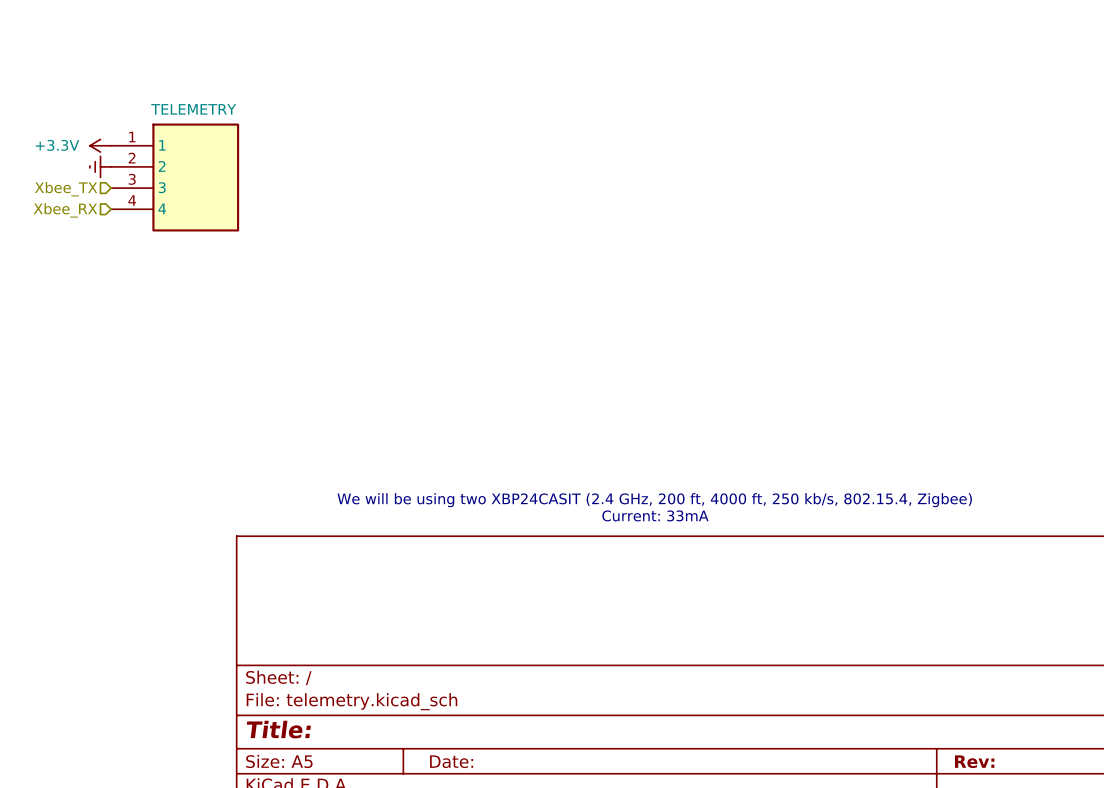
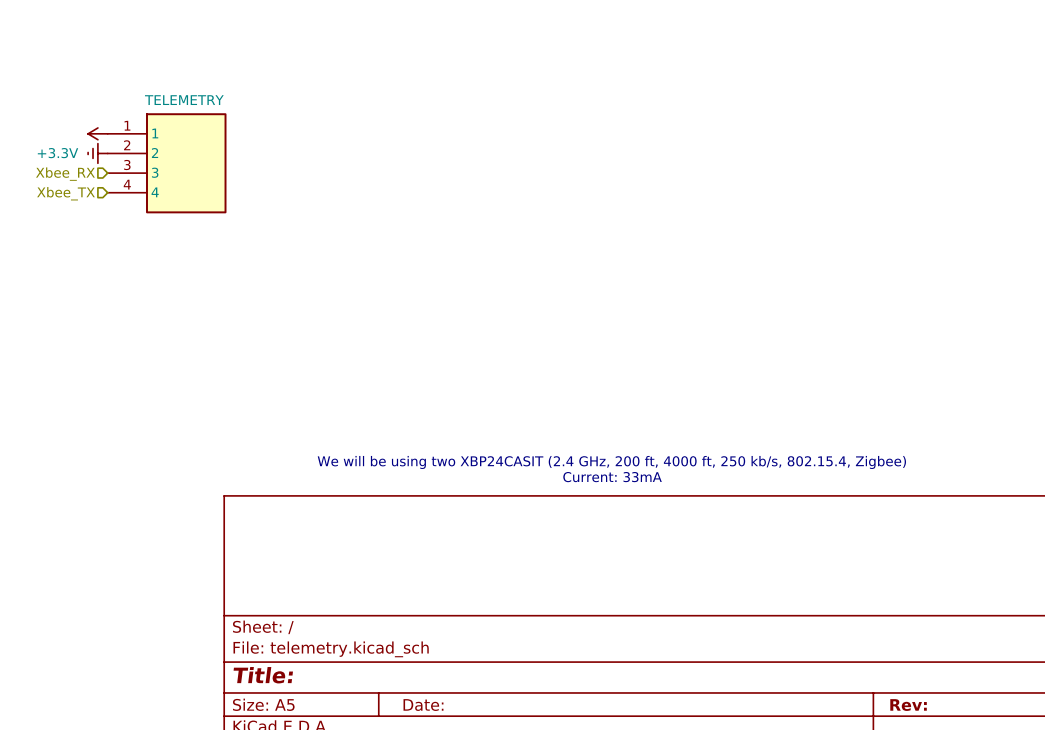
power symbol text: +3.3V (57, 145) -> none
power symbol text: none -> +3.3V (57, 153)
hierarchical label: Xbee_TX (66, 189) -> Xbee_RX (65, 174)
hierarchical label: Xbee_RX (65, 210) -> Xbee_TX (66, 193)

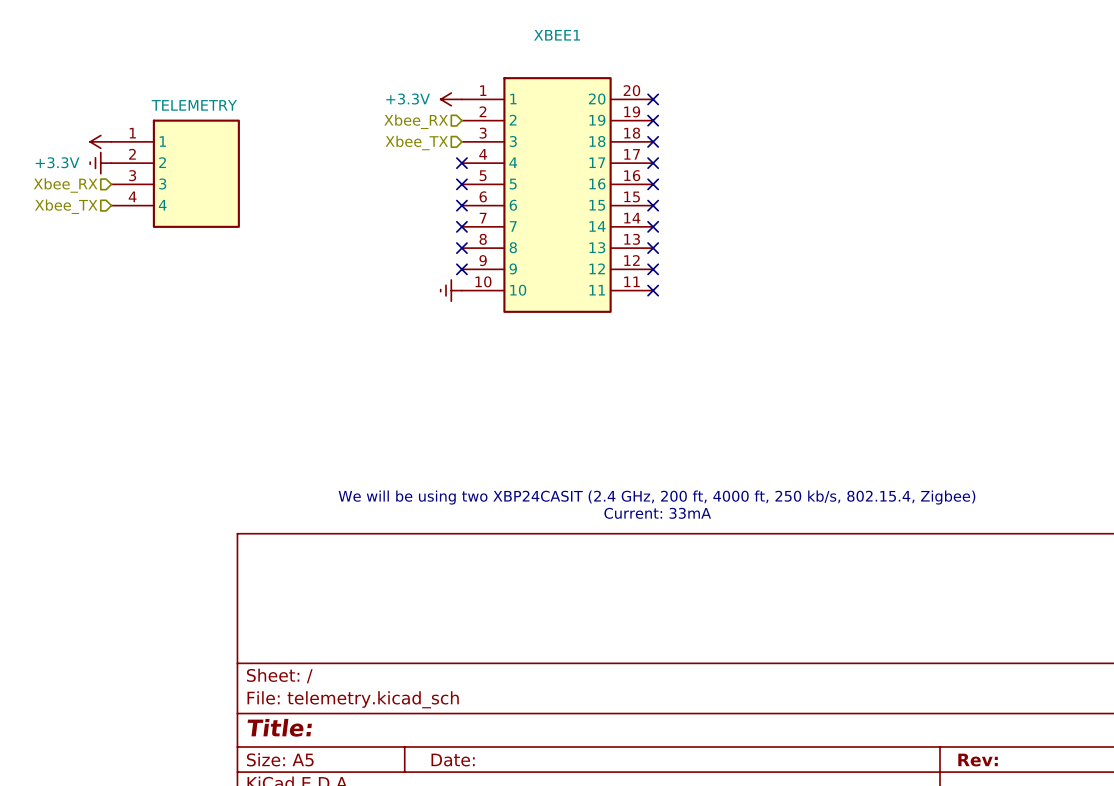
power symbol: none -> +3.3V (451, 99)
no-connect mark: none -> (653, 99)
no-connect mark: none -> (653, 120)
hierarchical label: none -> Xbee_RX (416, 121)
no-connect mark: none -> (653, 141)
hierarchical label: none -> Xbee_TX (416, 142)
no-connect mark: none -> (461, 163)
no-connect mark: none -> (653, 163)
no-connect mark: none -> (461, 184)
no-connect mark: none -> (653, 184)
XBEE1: none -> (557, 195)
no-connect mark: none -> (461, 205)
no-connect mark: none -> (653, 205)
no-connect mark: none -> (461, 226)
no-connect mark: none -> (653, 226)
no-connect mark: none -> (461, 248)
no-connect mark: none -> (653, 248)
no-connect mark: none -> (461, 269)
no-connect mark: none -> (653, 269)
power symbol: none -> (451, 290)
no-connect mark: none -> (653, 290)

